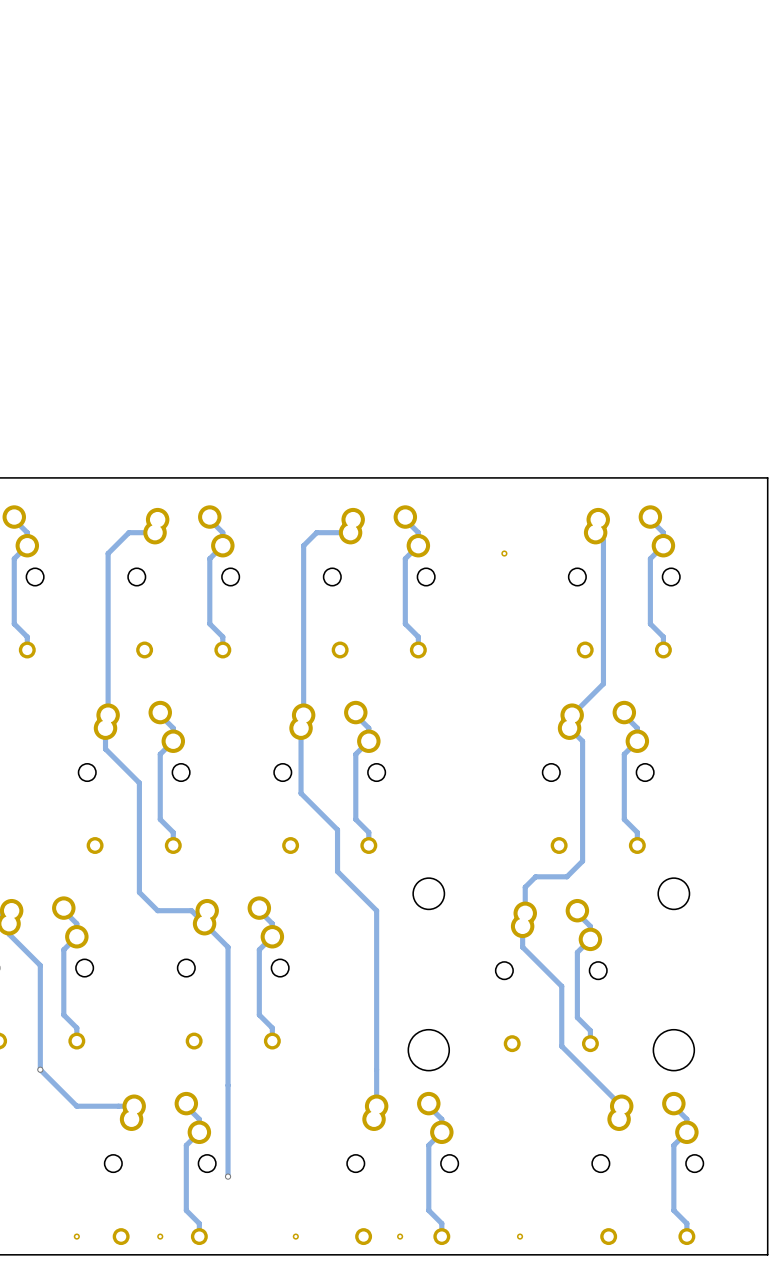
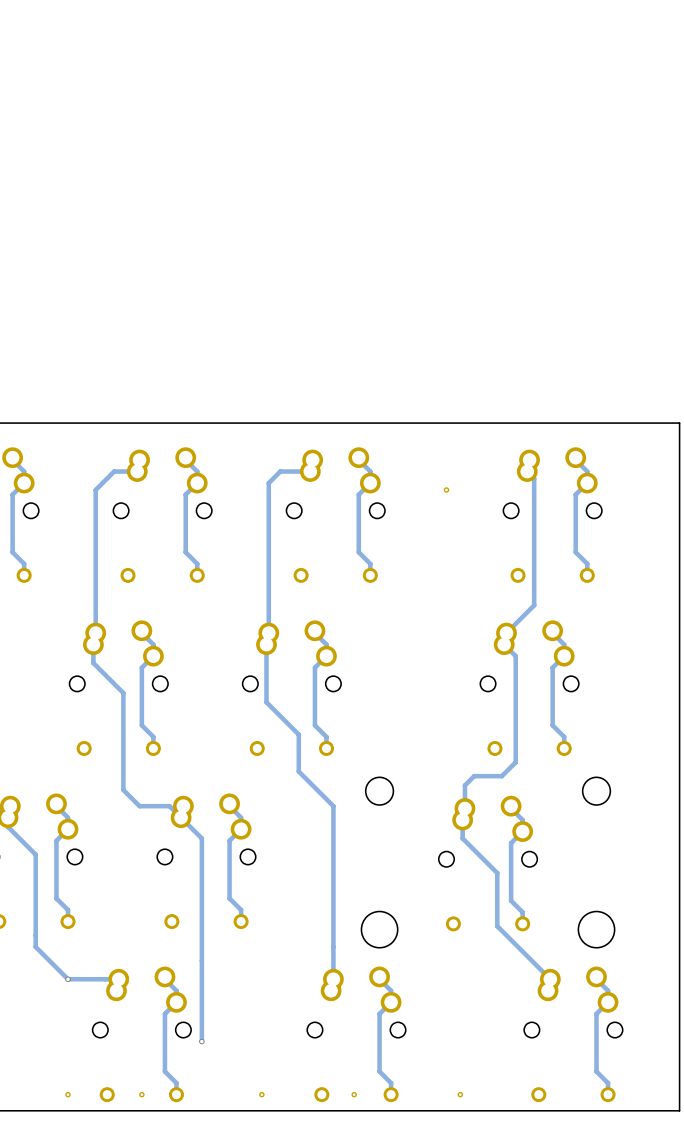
via position: (40, 1069) -> (68, 979)

